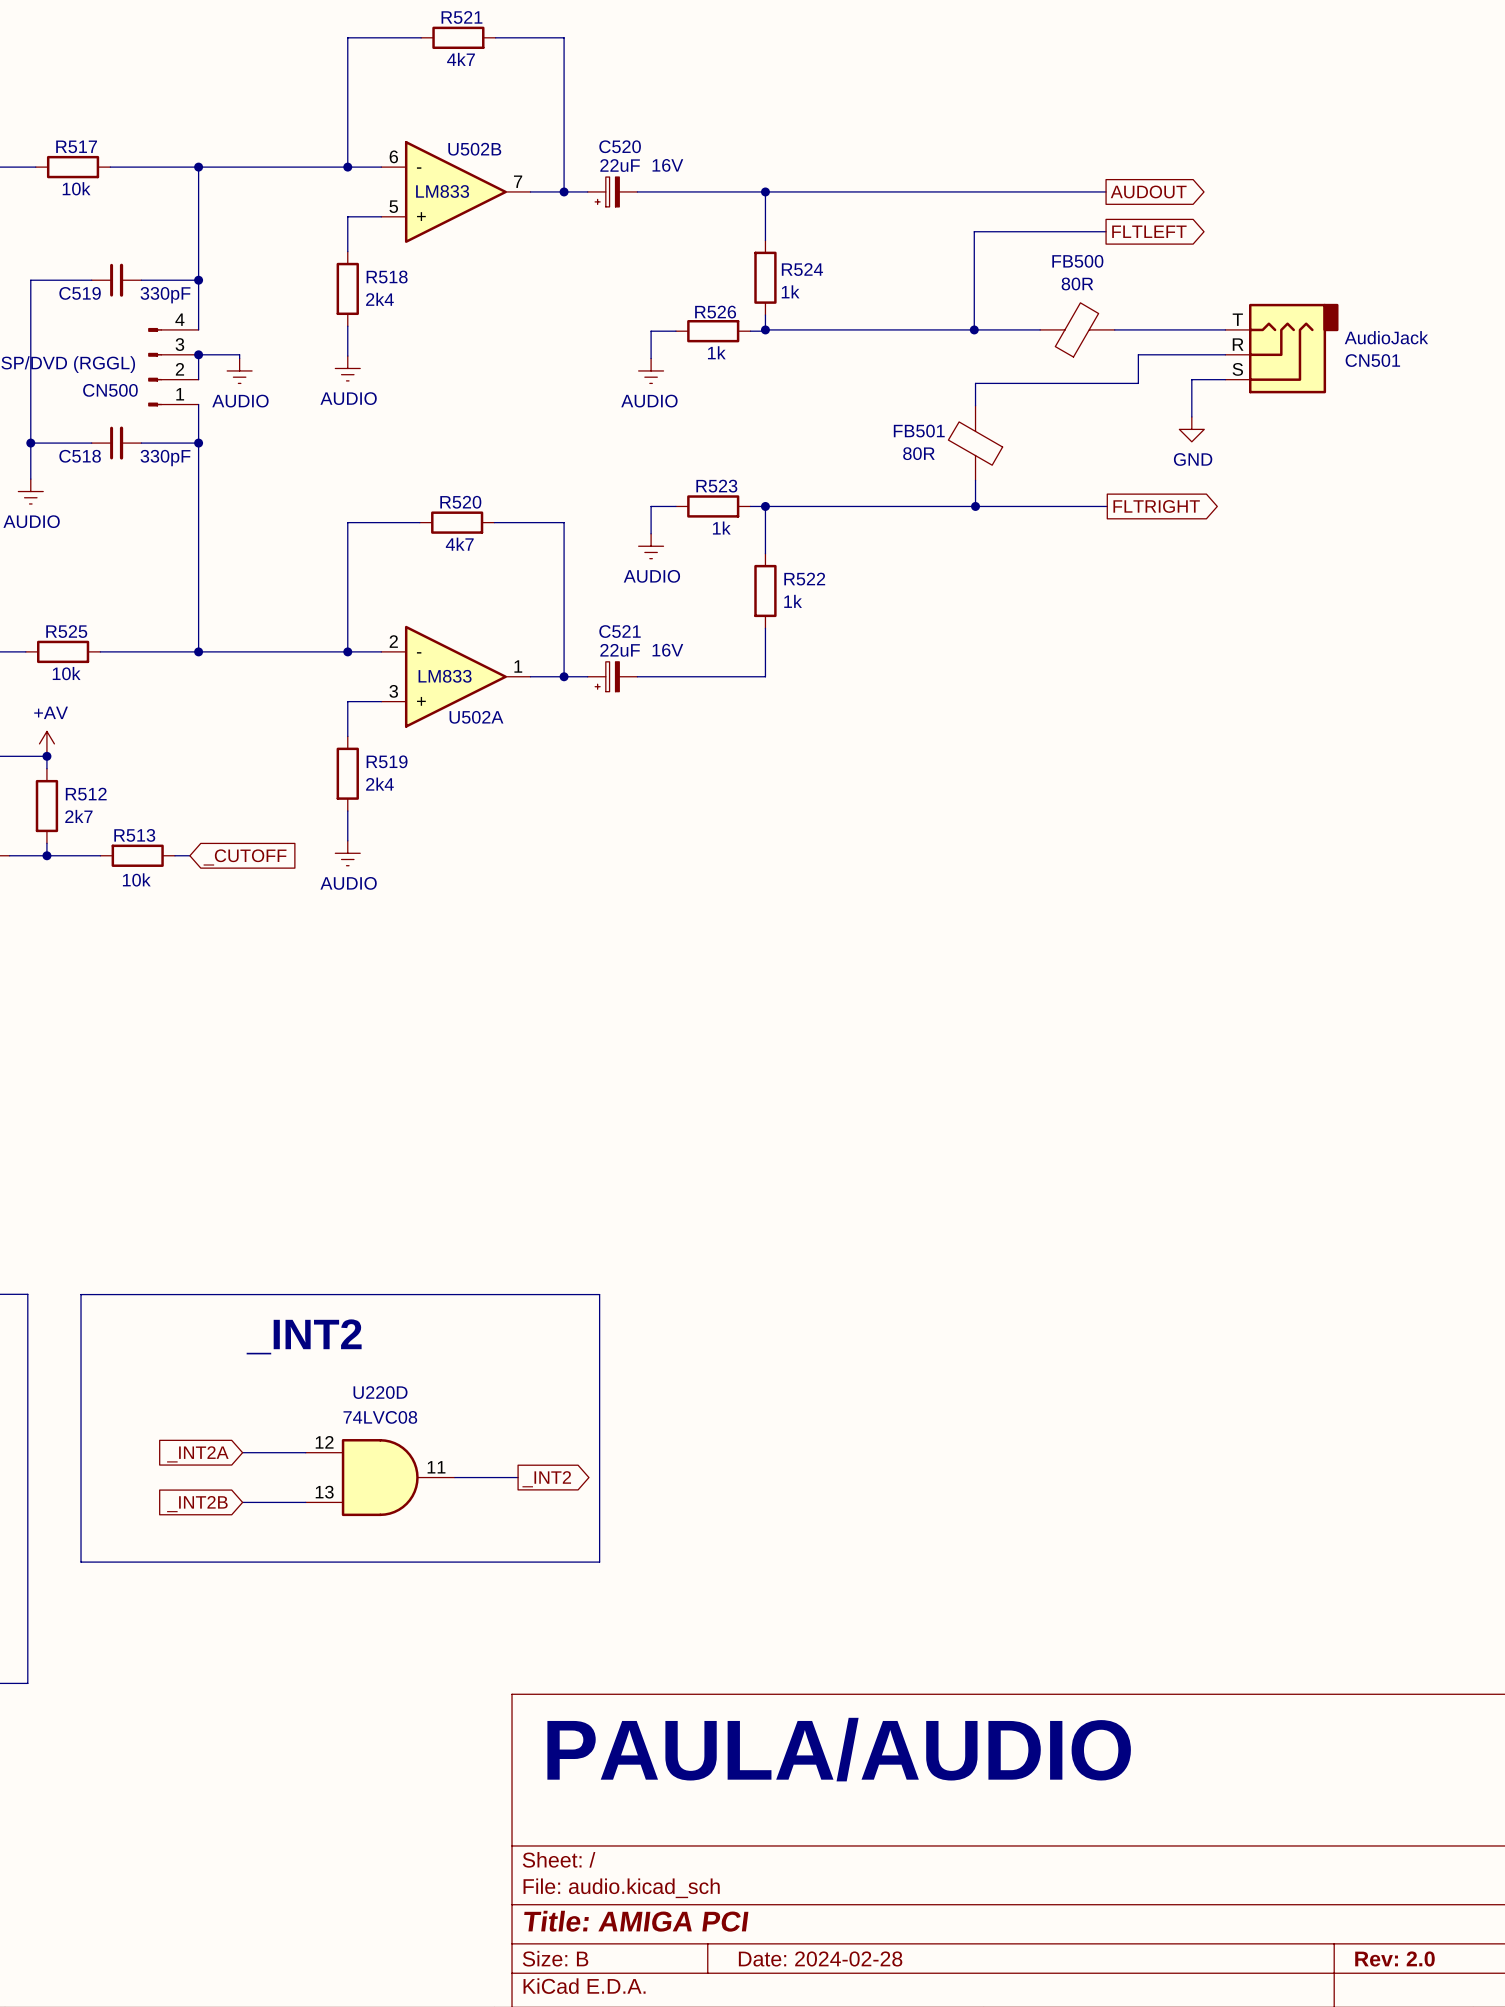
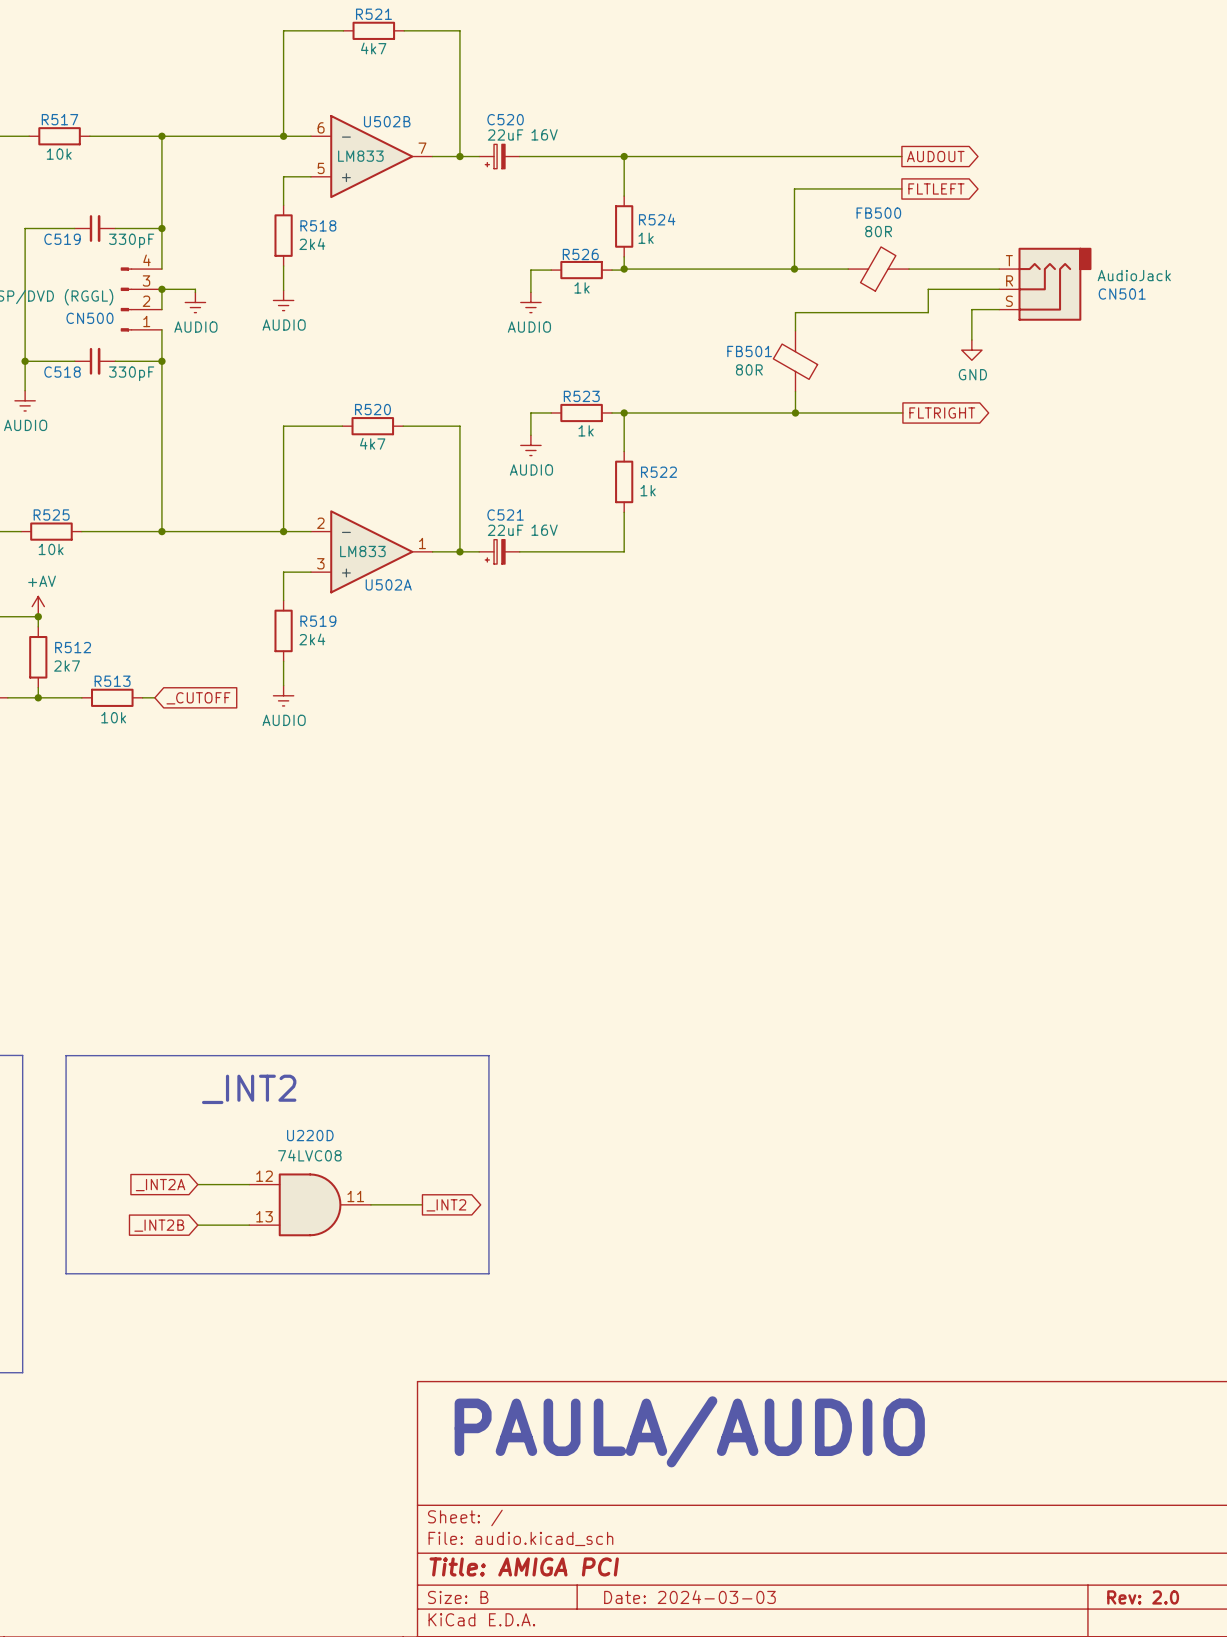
title block: Date: 2024-02-28 (820, 1958) -> Date: 2024-03-03 (689, 1597)

